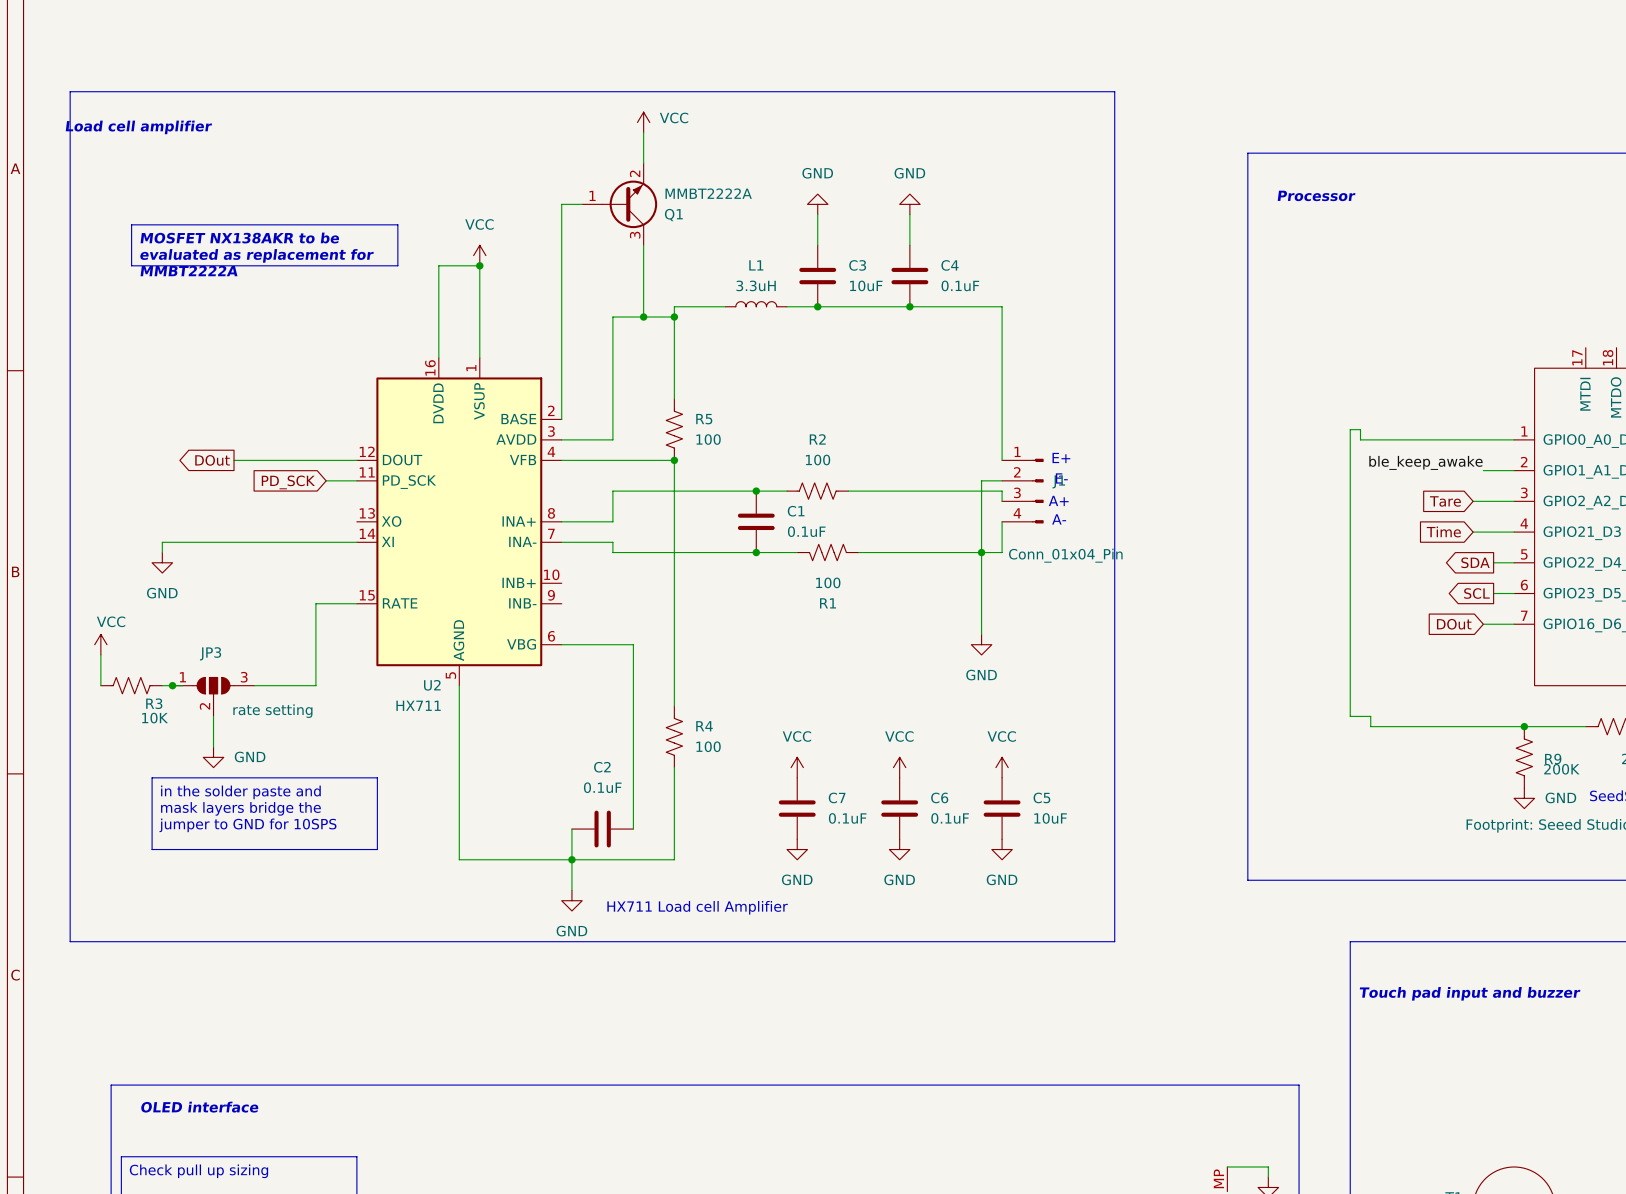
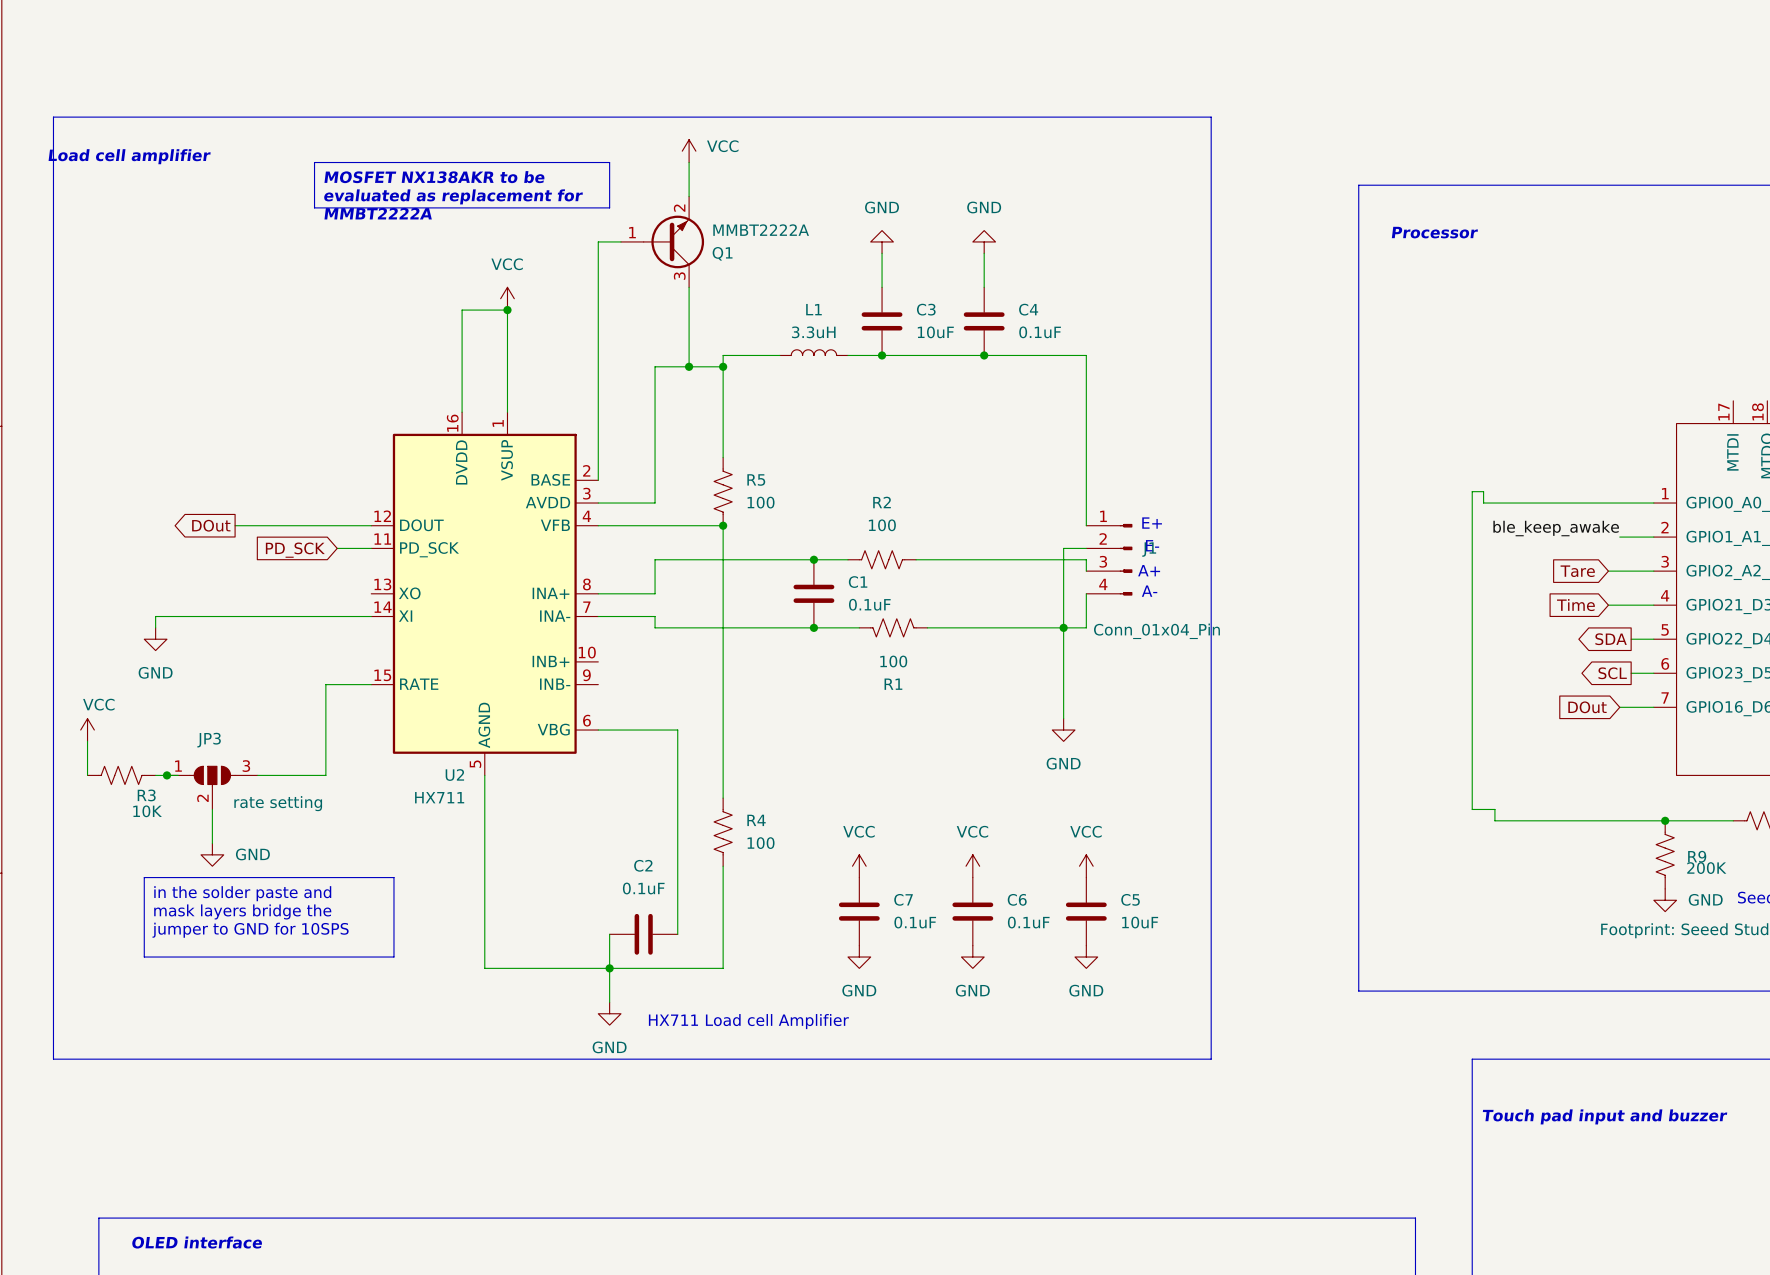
line: (131, 224) (397, 224) (397, 265) (131, 265) (131, 224) -> (314, 162) (609, 162) (609, 207) (314, 207) (314, 162)
text position: MOSFET NX138AKR to be (239, 238) -> MOSFET NX138AKR to be (434, 177)
text position: evaluated as replacement for (256, 255) -> evaluated as replacement for (453, 196)
text position: MMBT2222A (189, 271) -> MMBT2222A (378, 213)

